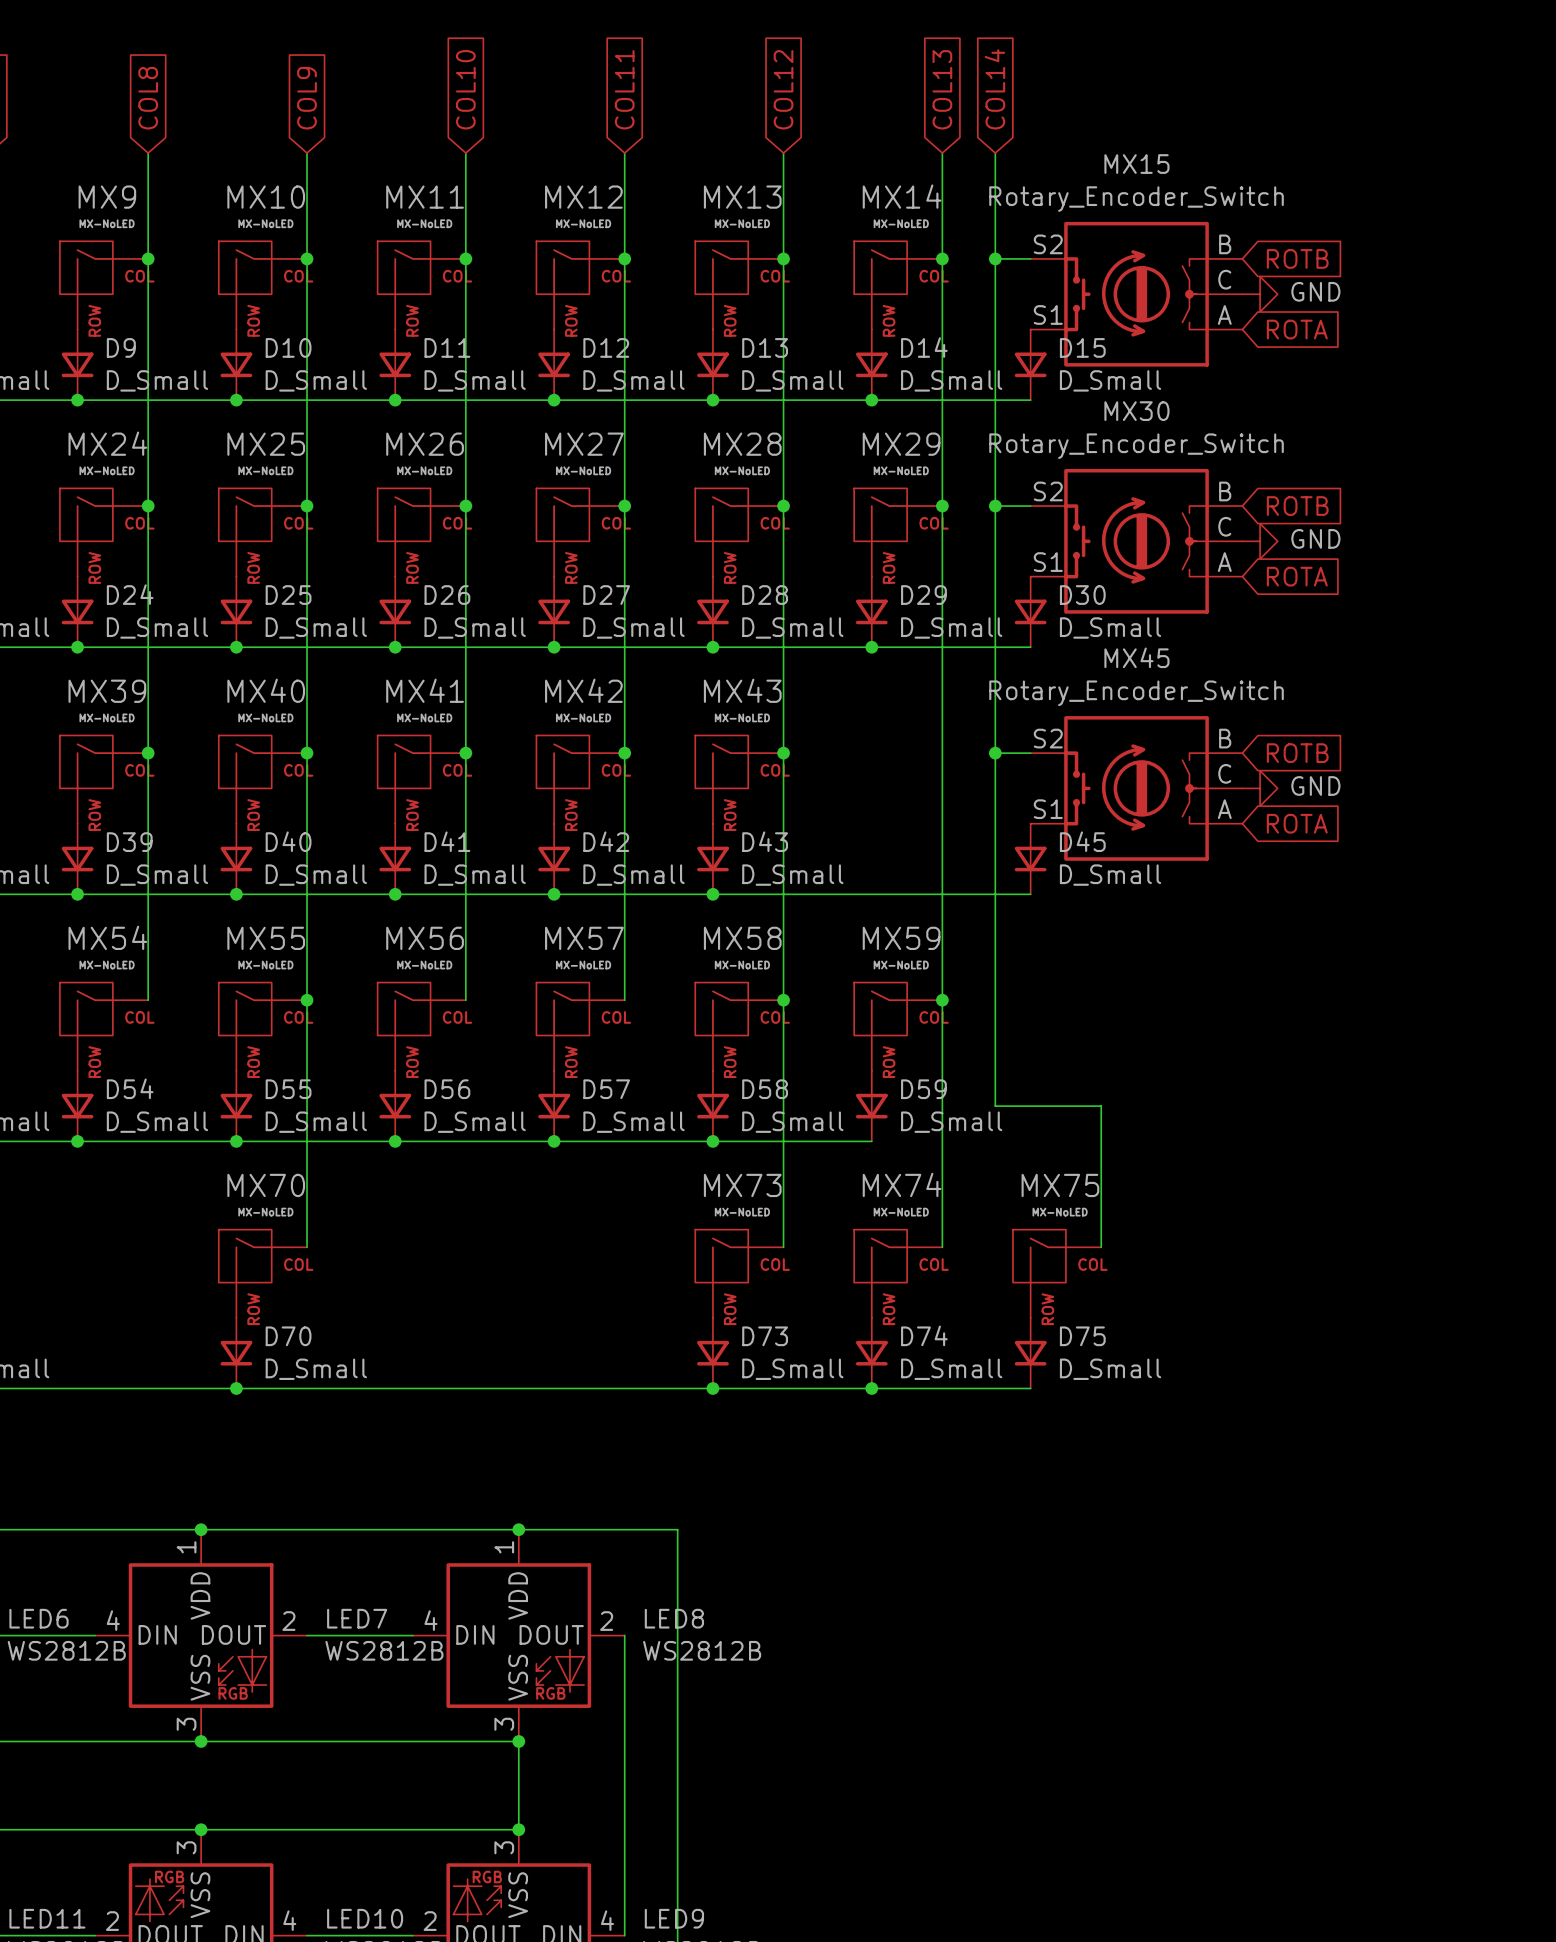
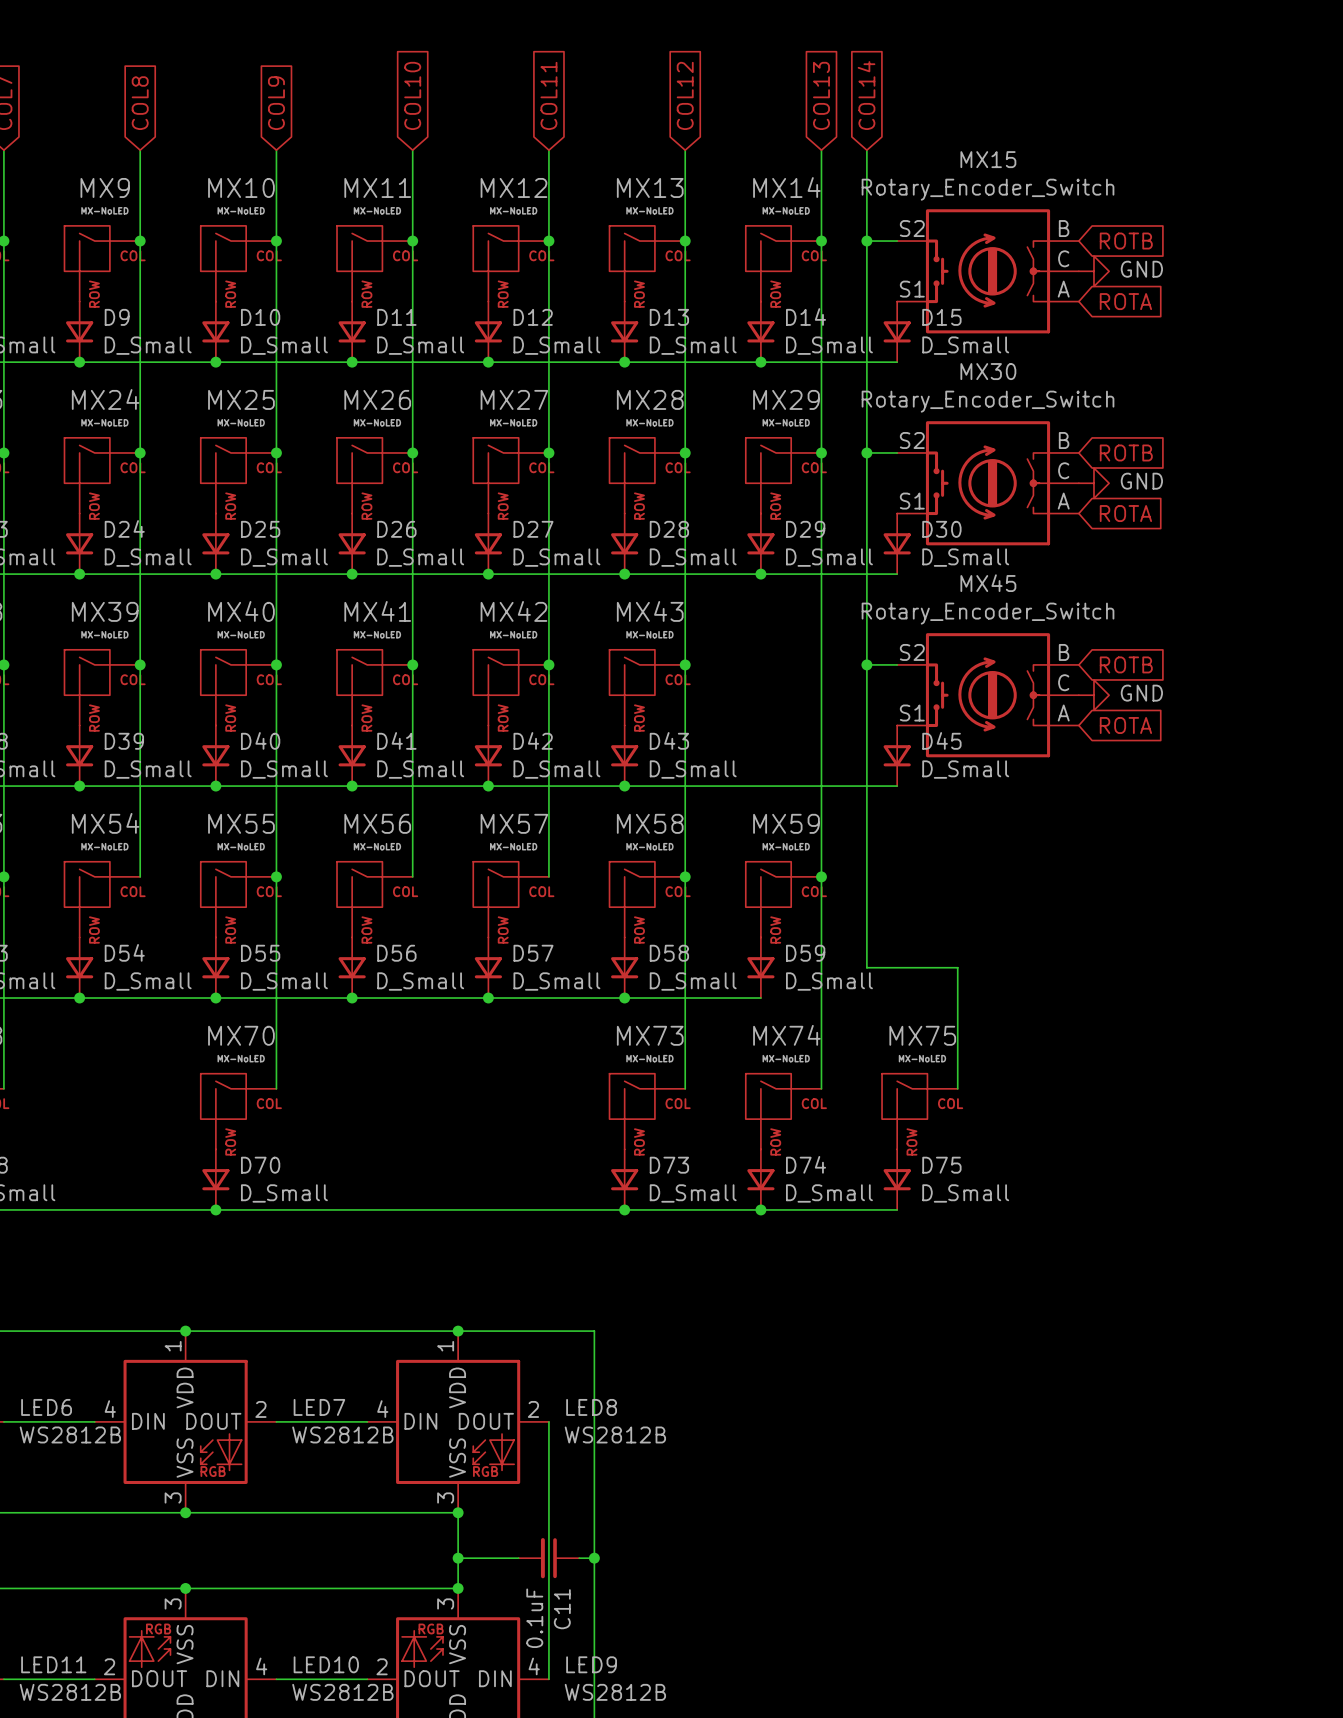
wire: none -> (458, 1558) (518, 1558)
junction: none -> (458, 1558)
C11: none -> 0.1uF (548, 1558)
wire: none -> (579, 1558) (594, 1558)
junction: none -> (594, 1558)

